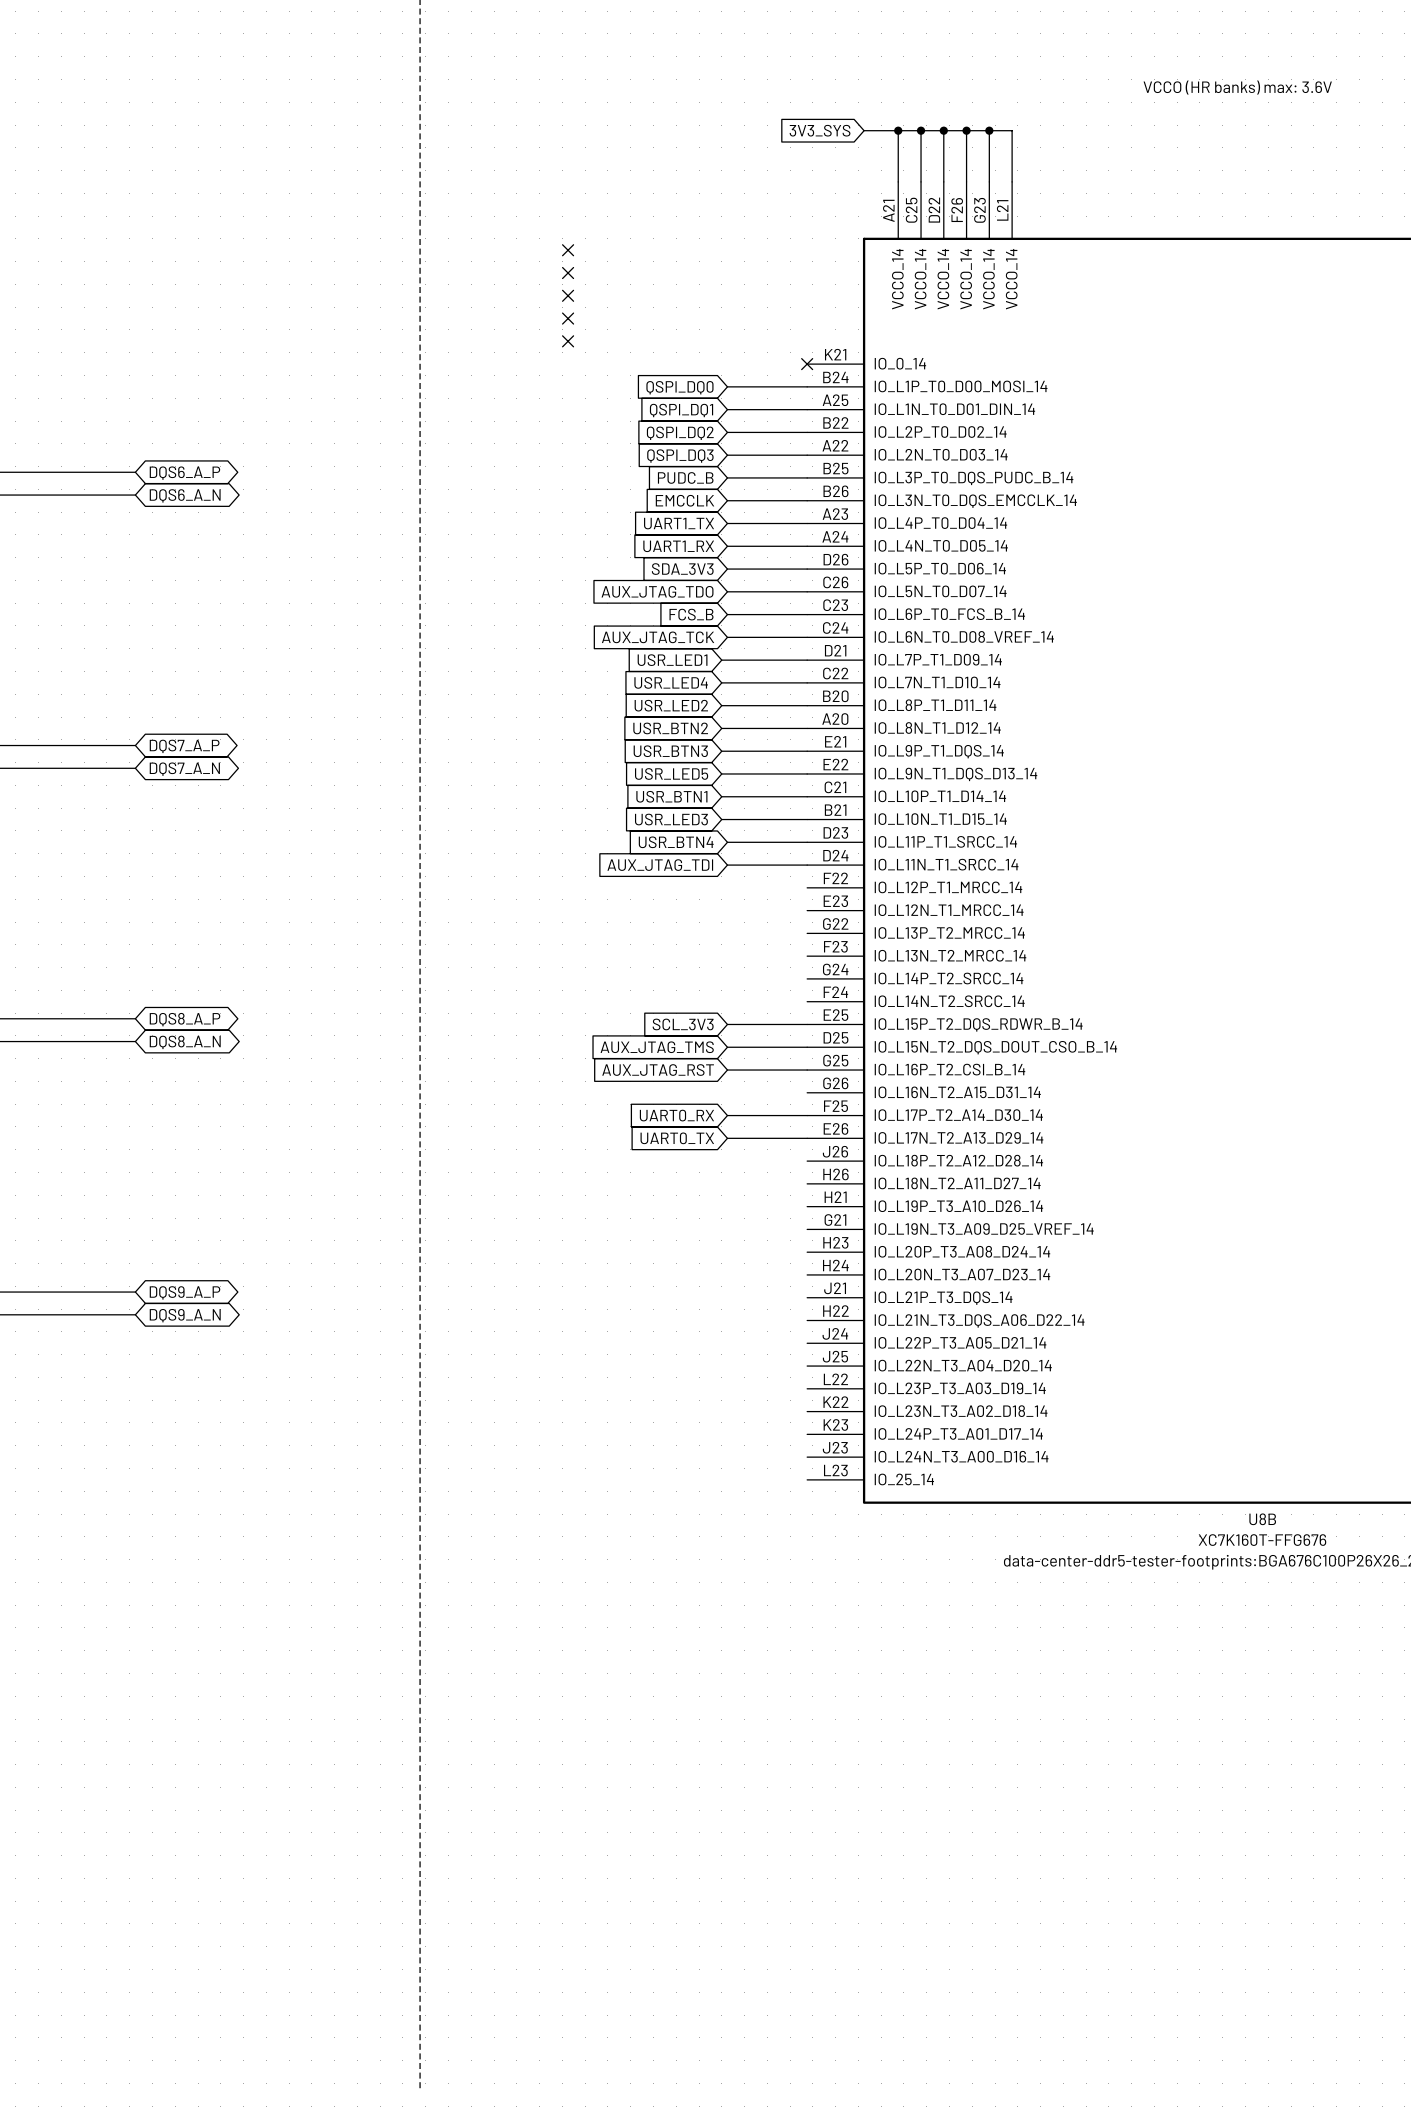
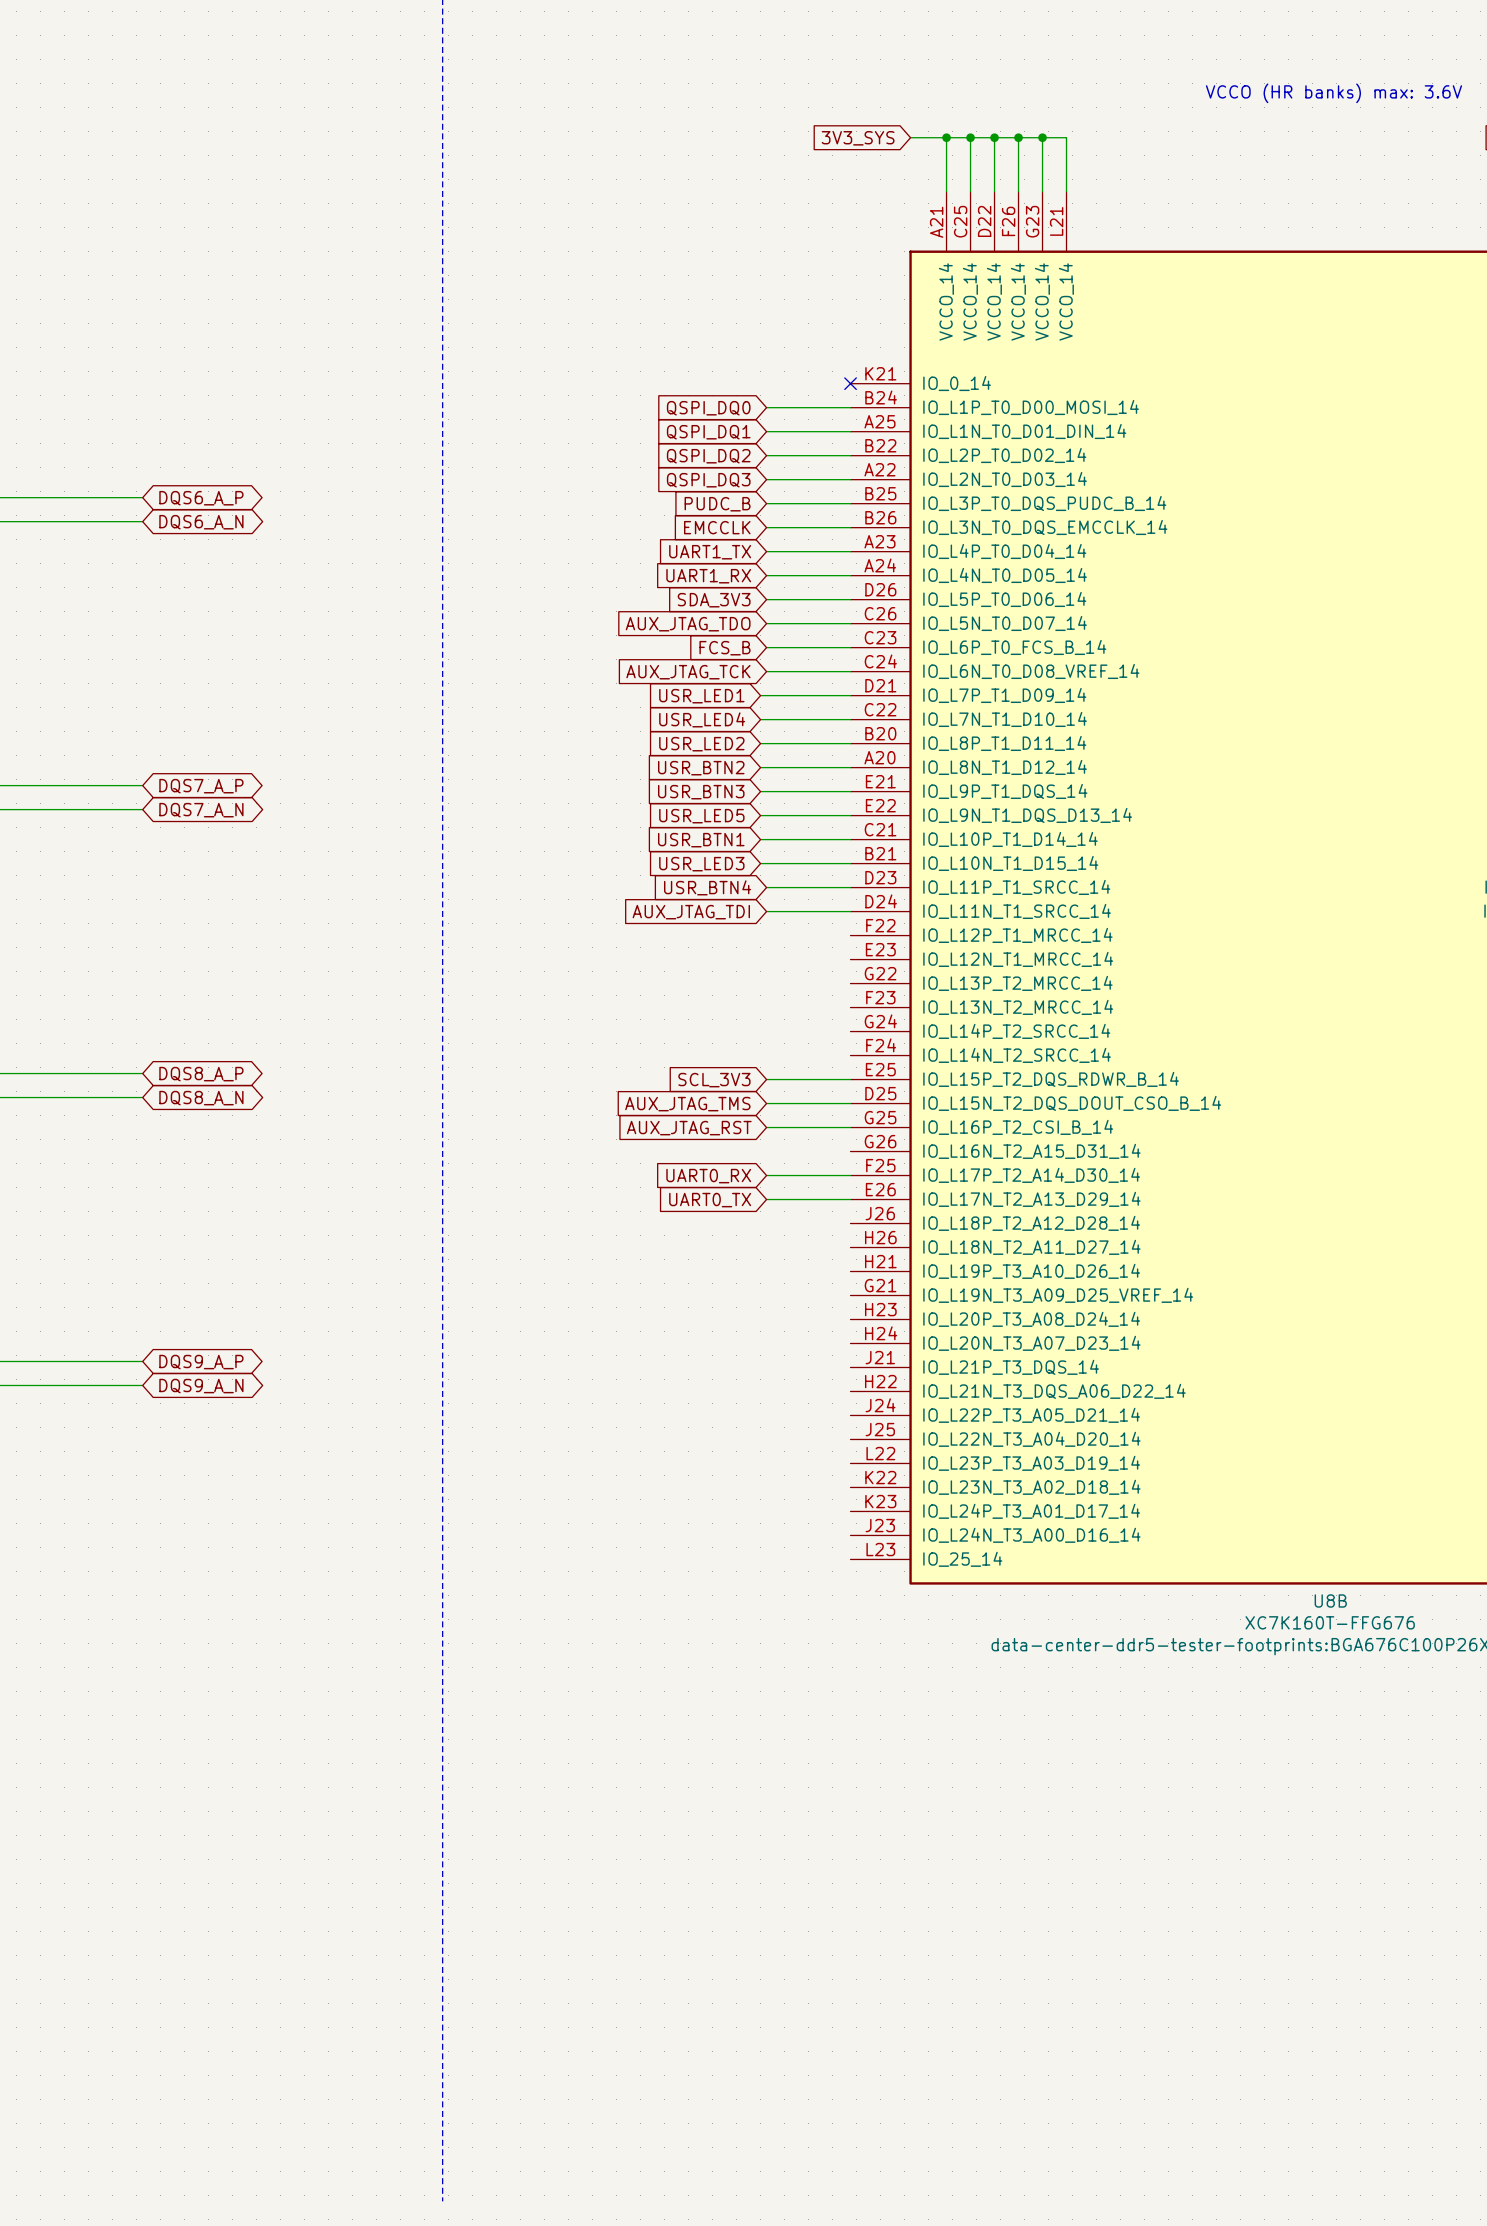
no-connect mark: (568, 250) -> none
no-connect mark: (568, 273) -> none
no-connect mark: (568, 295) -> none
no-connect mark: (568, 318) -> none
no-connect mark: (568, 341) -> none

